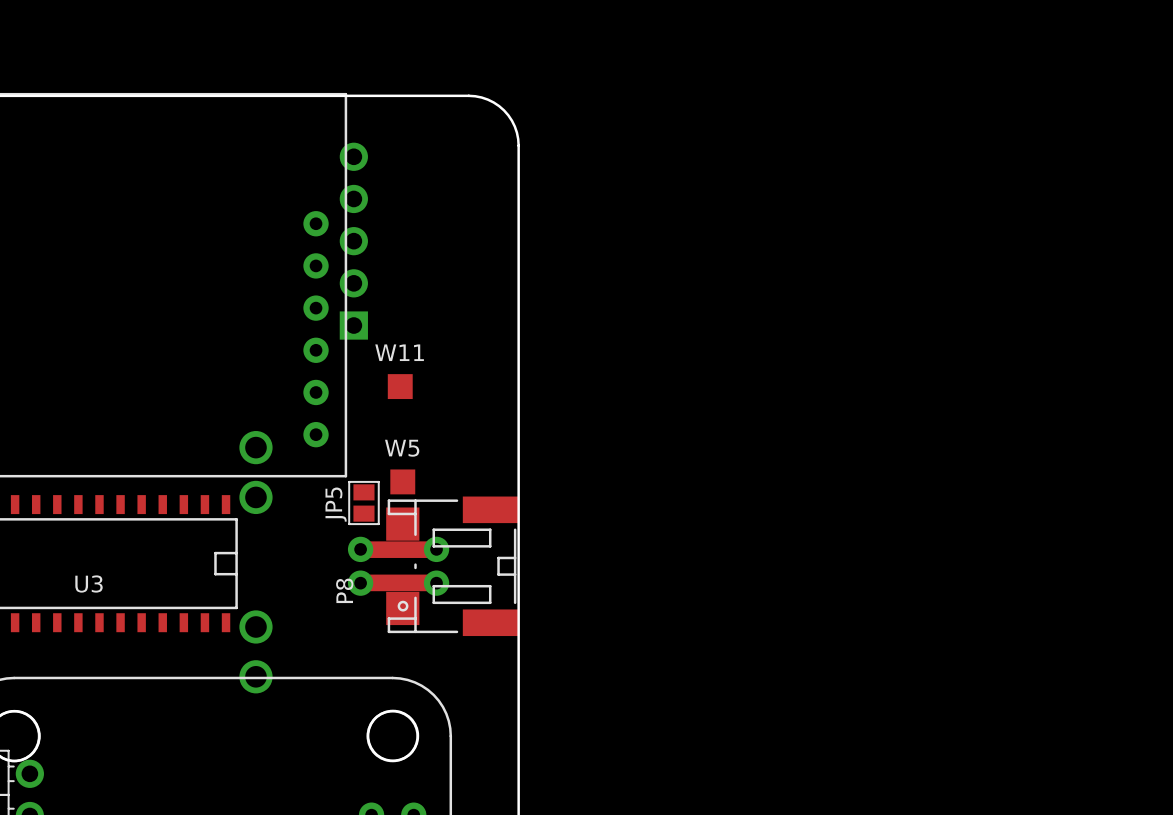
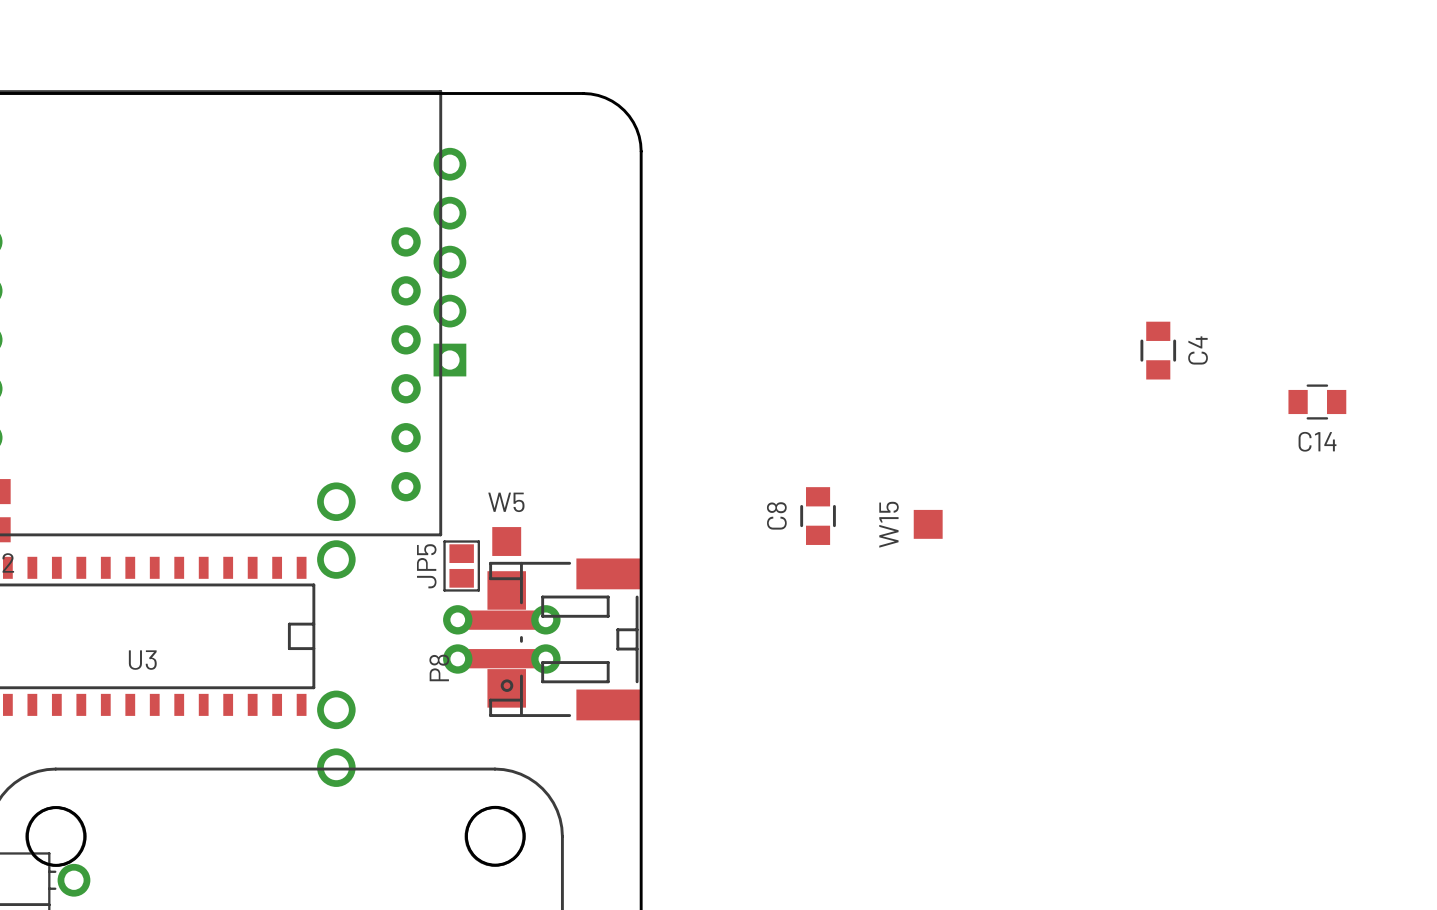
C4: none -> (1158, 350)
C14: none -> (1317, 402)
W11: (400, 386) -> none
C8: none -> (818, 516)
W15: none -> (928, 524)

